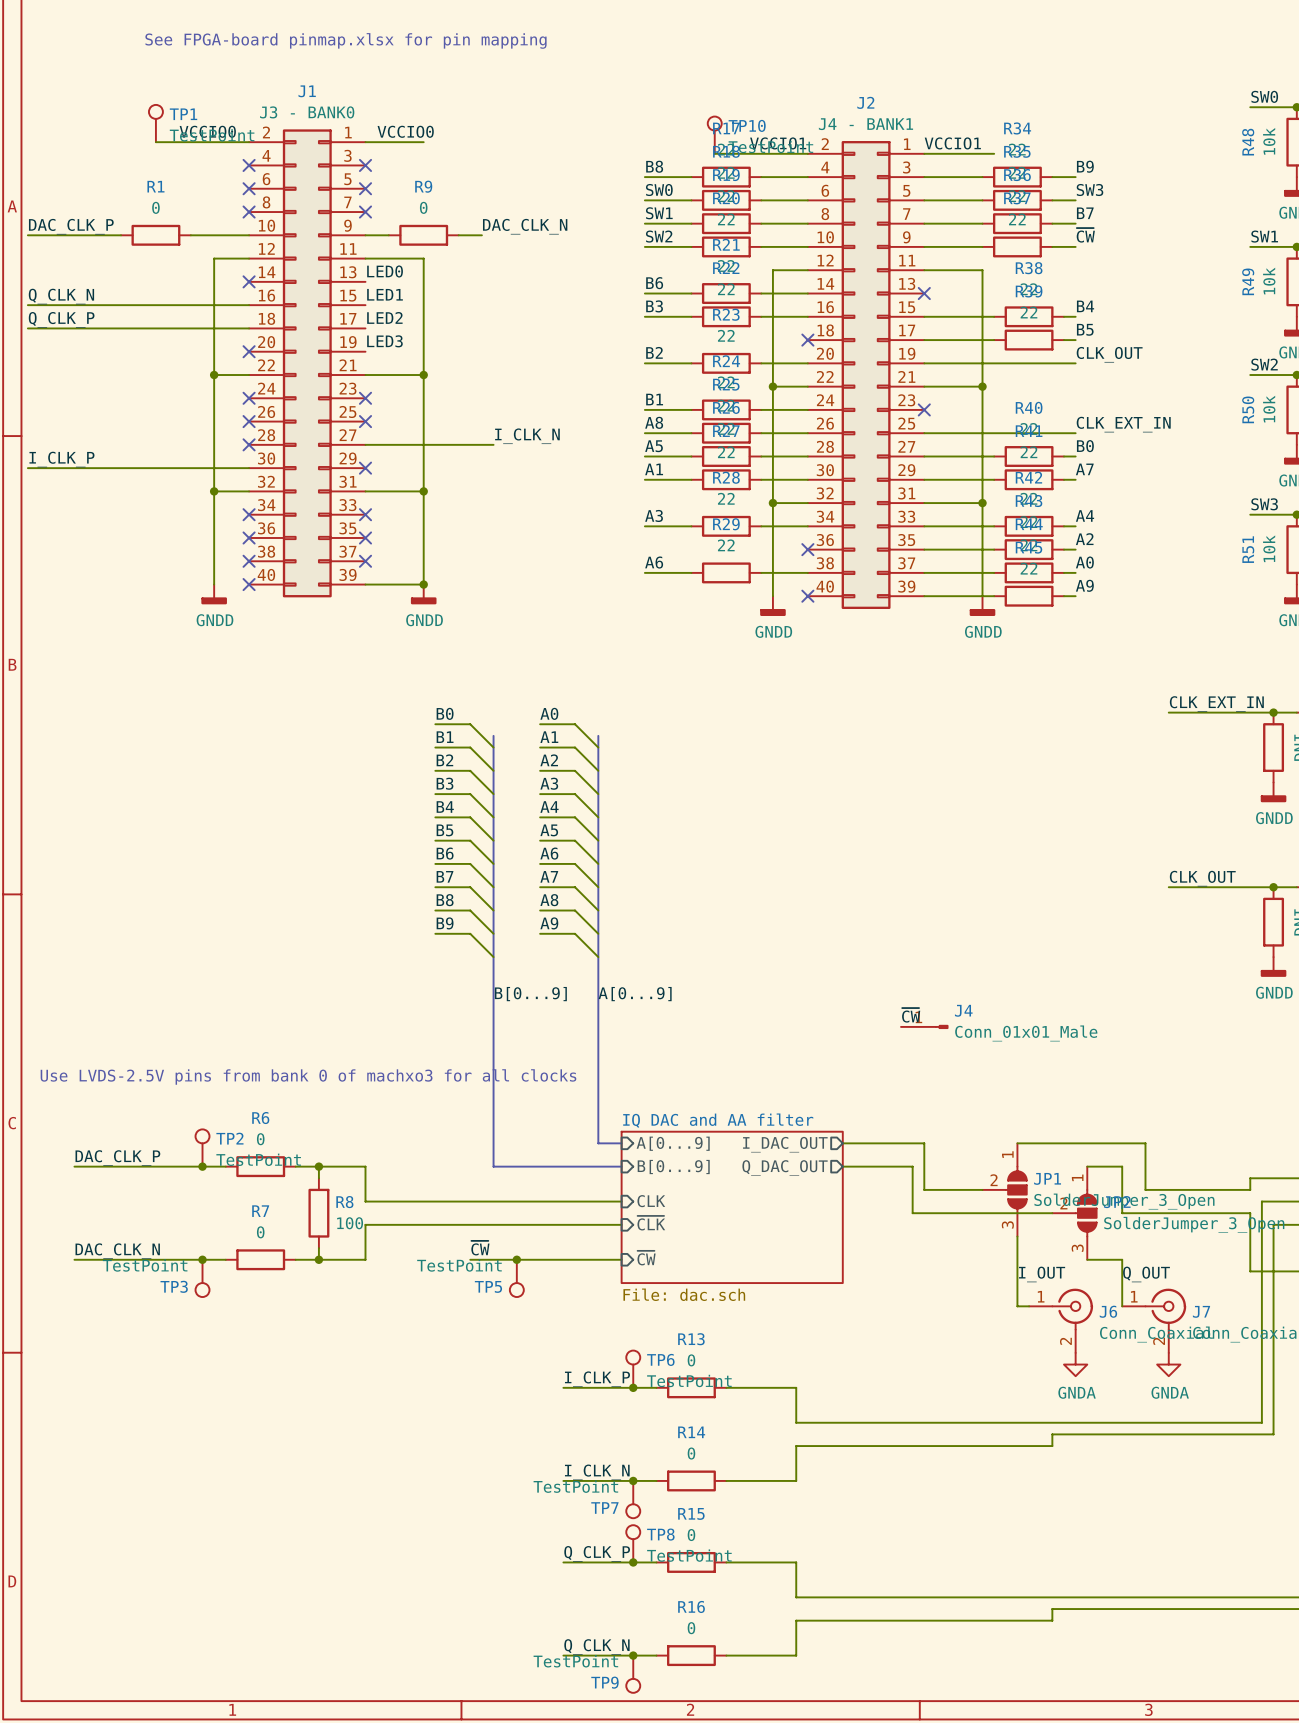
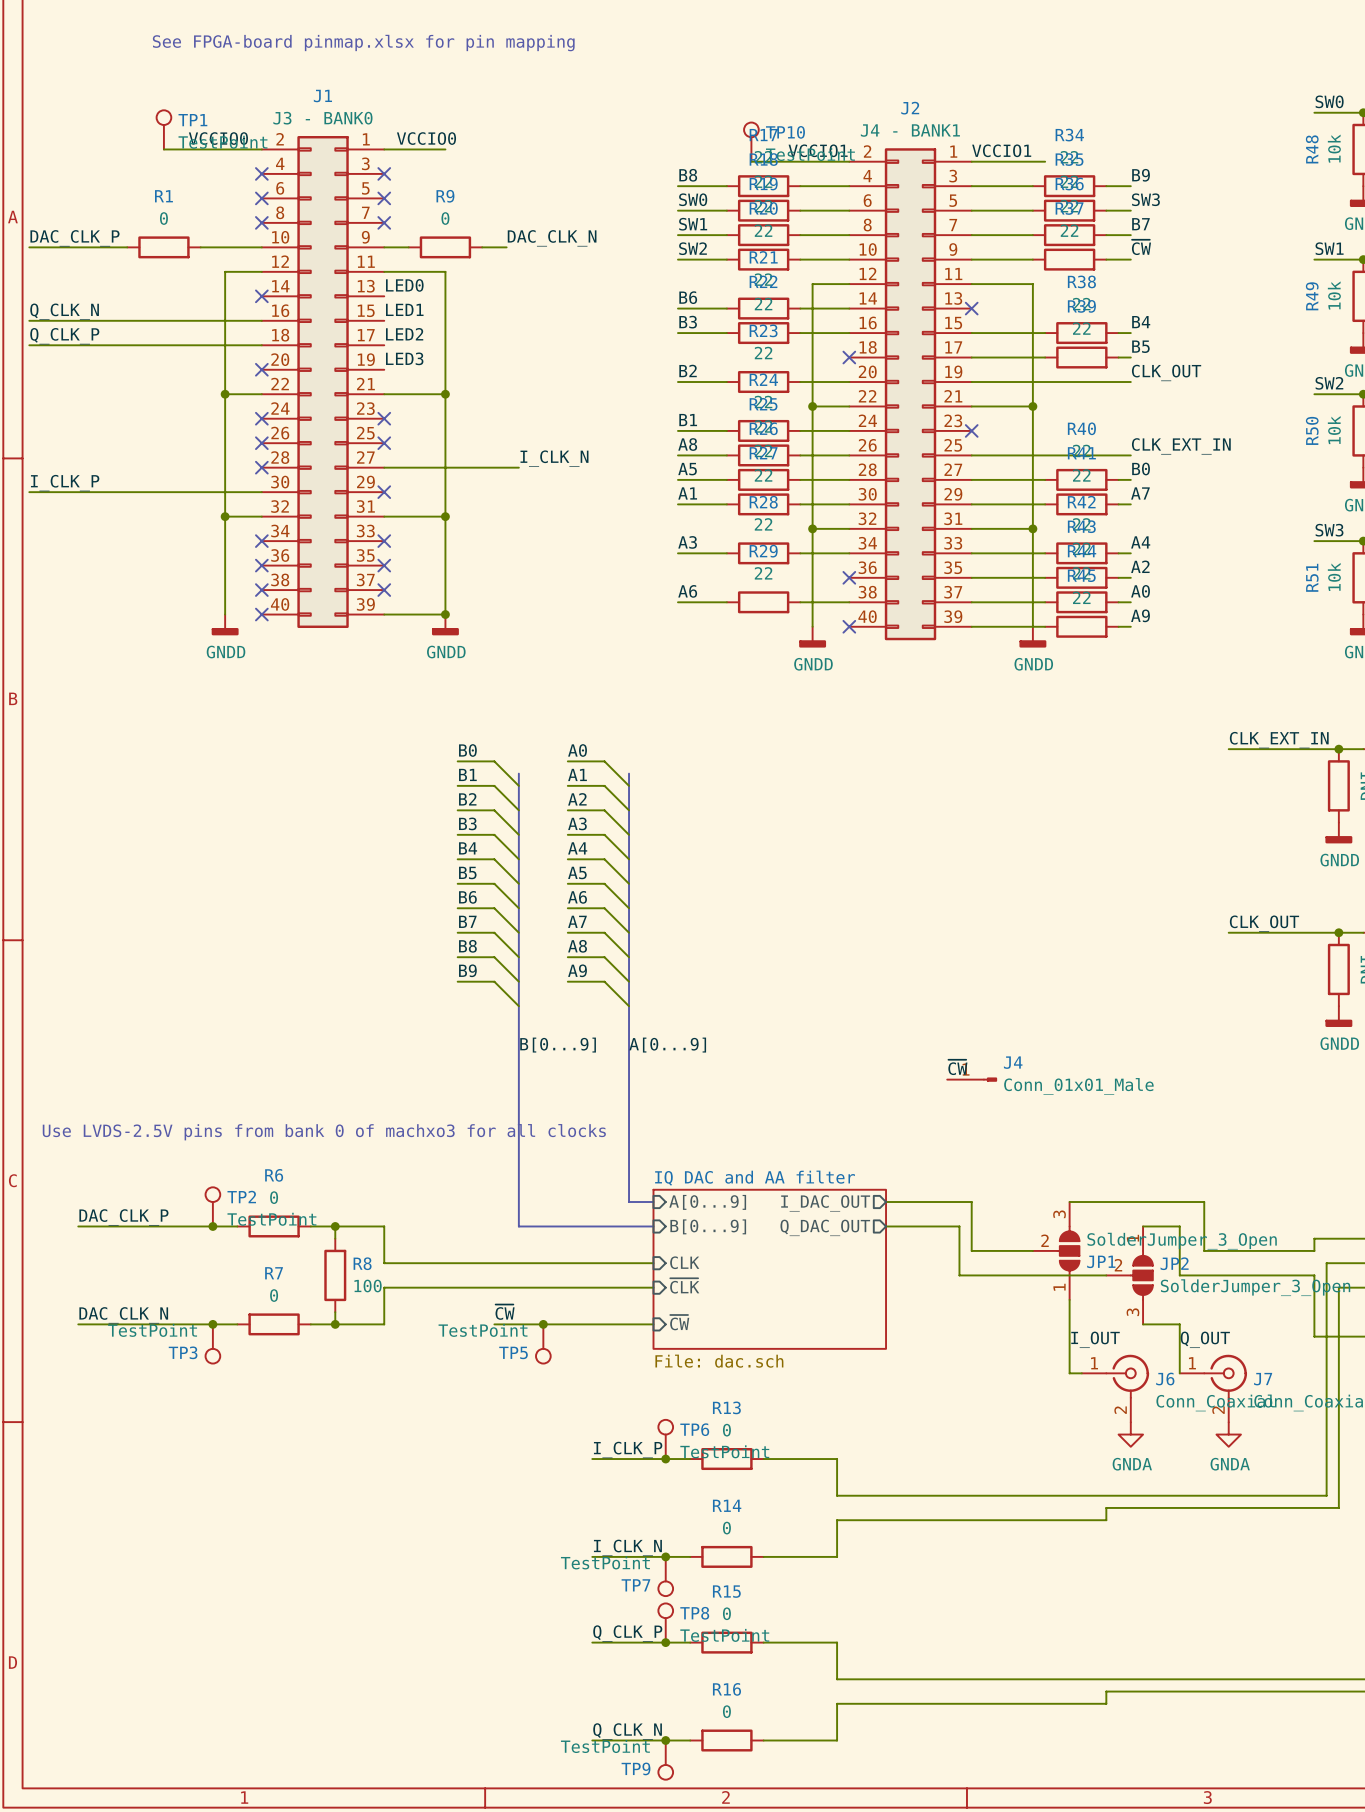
JP1 flip: as is (1016, 1189) -> up-down (1068, 1250)

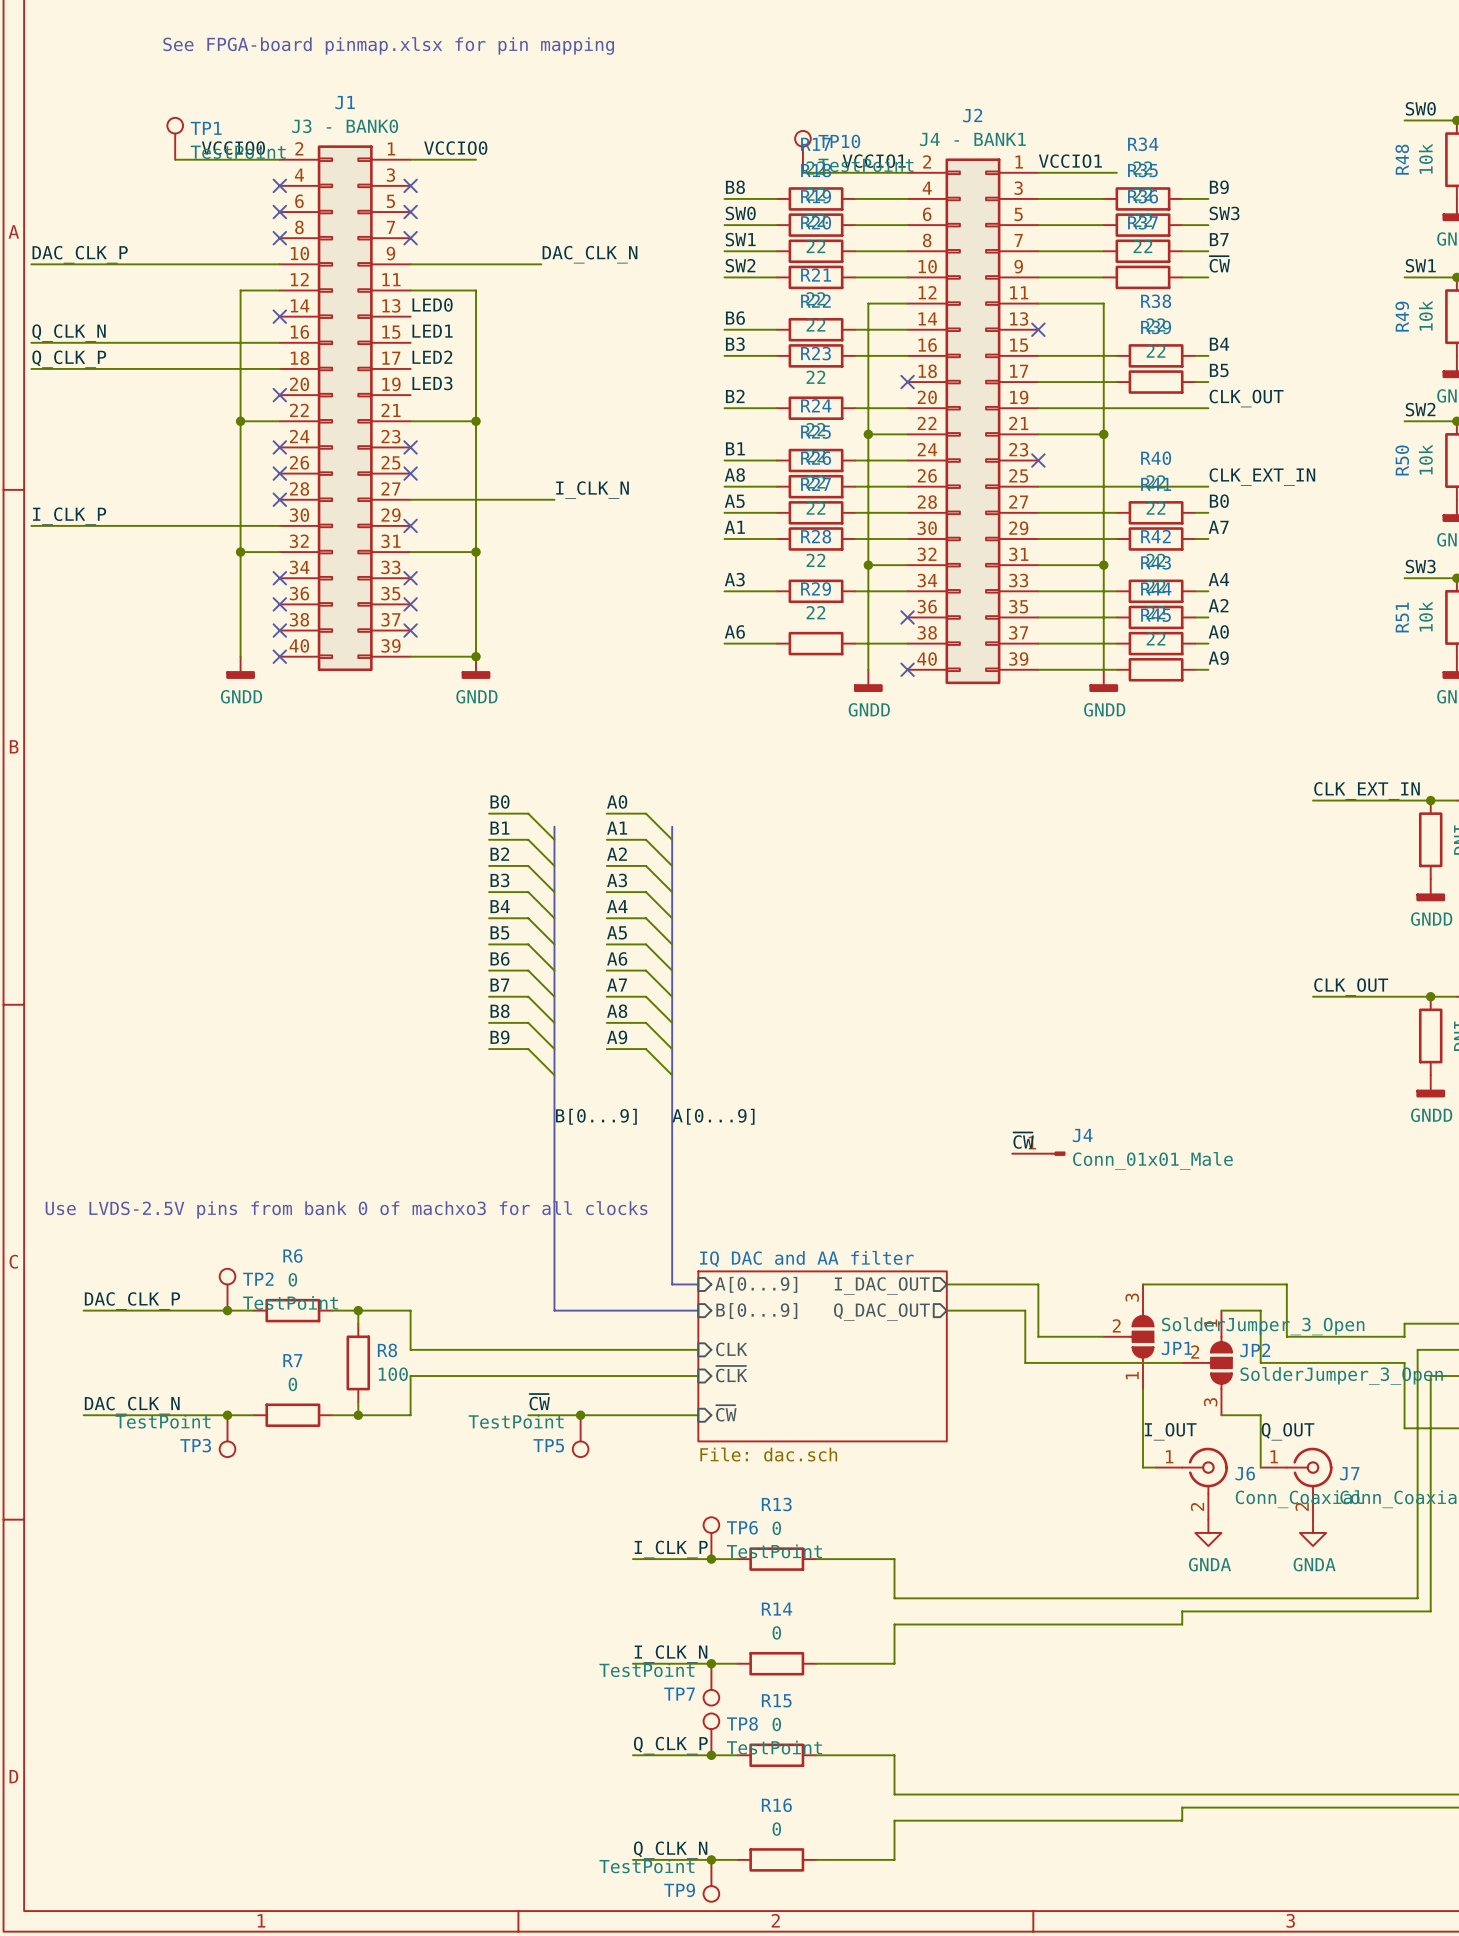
wire: none -> (135, 264) (214, 264)
R1: 0 (163, 247) -> none
wire: none -> (436, 264) (515, 264)
R9: 0 (445, 247) -> none

